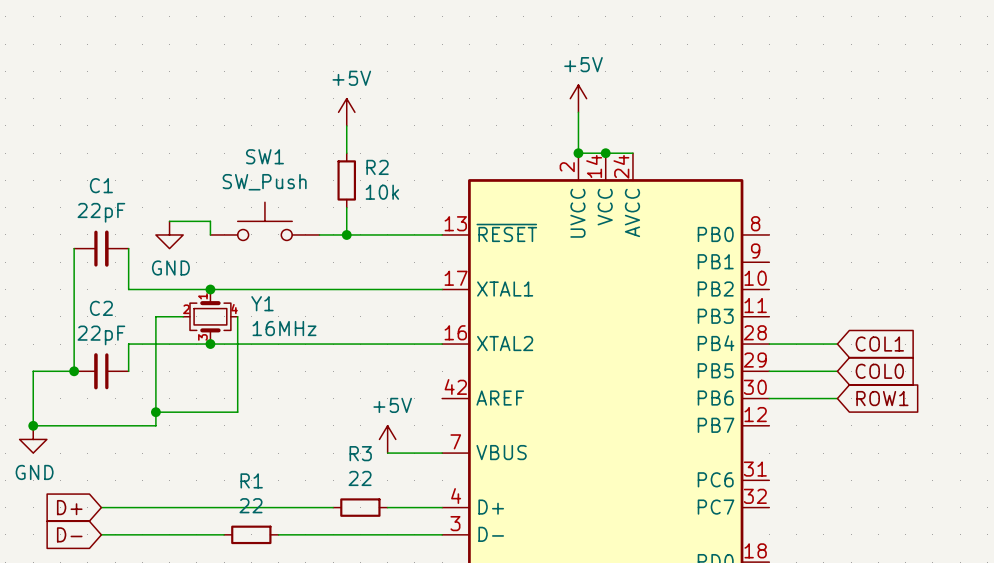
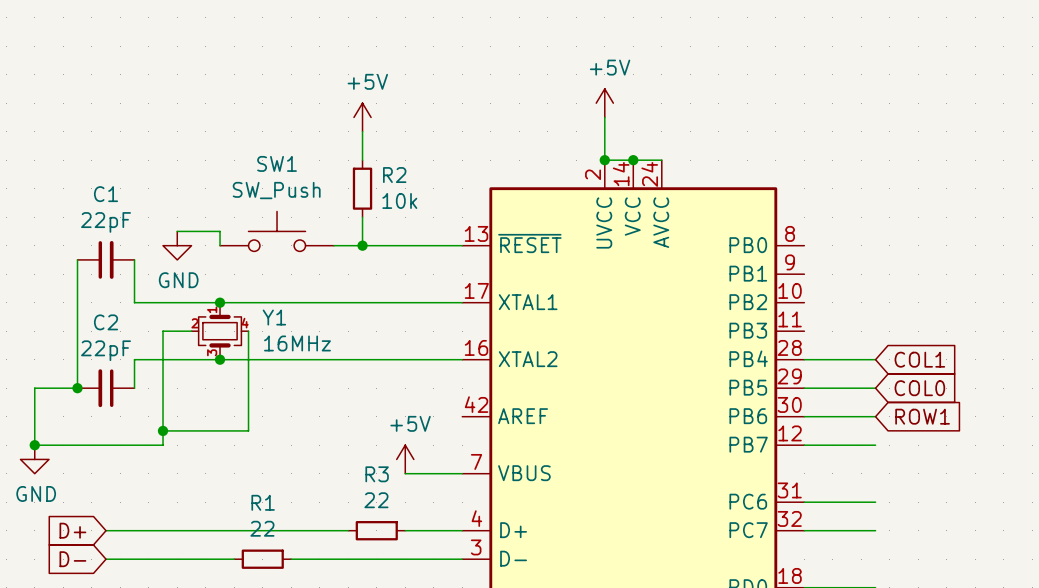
wire: none -> (804, 445) (875, 445)
wire: none -> (804, 502) (875, 502)
wire: none -> (804, 530) (875, 530)
wire: none -> (804, 587) (875, 587)

